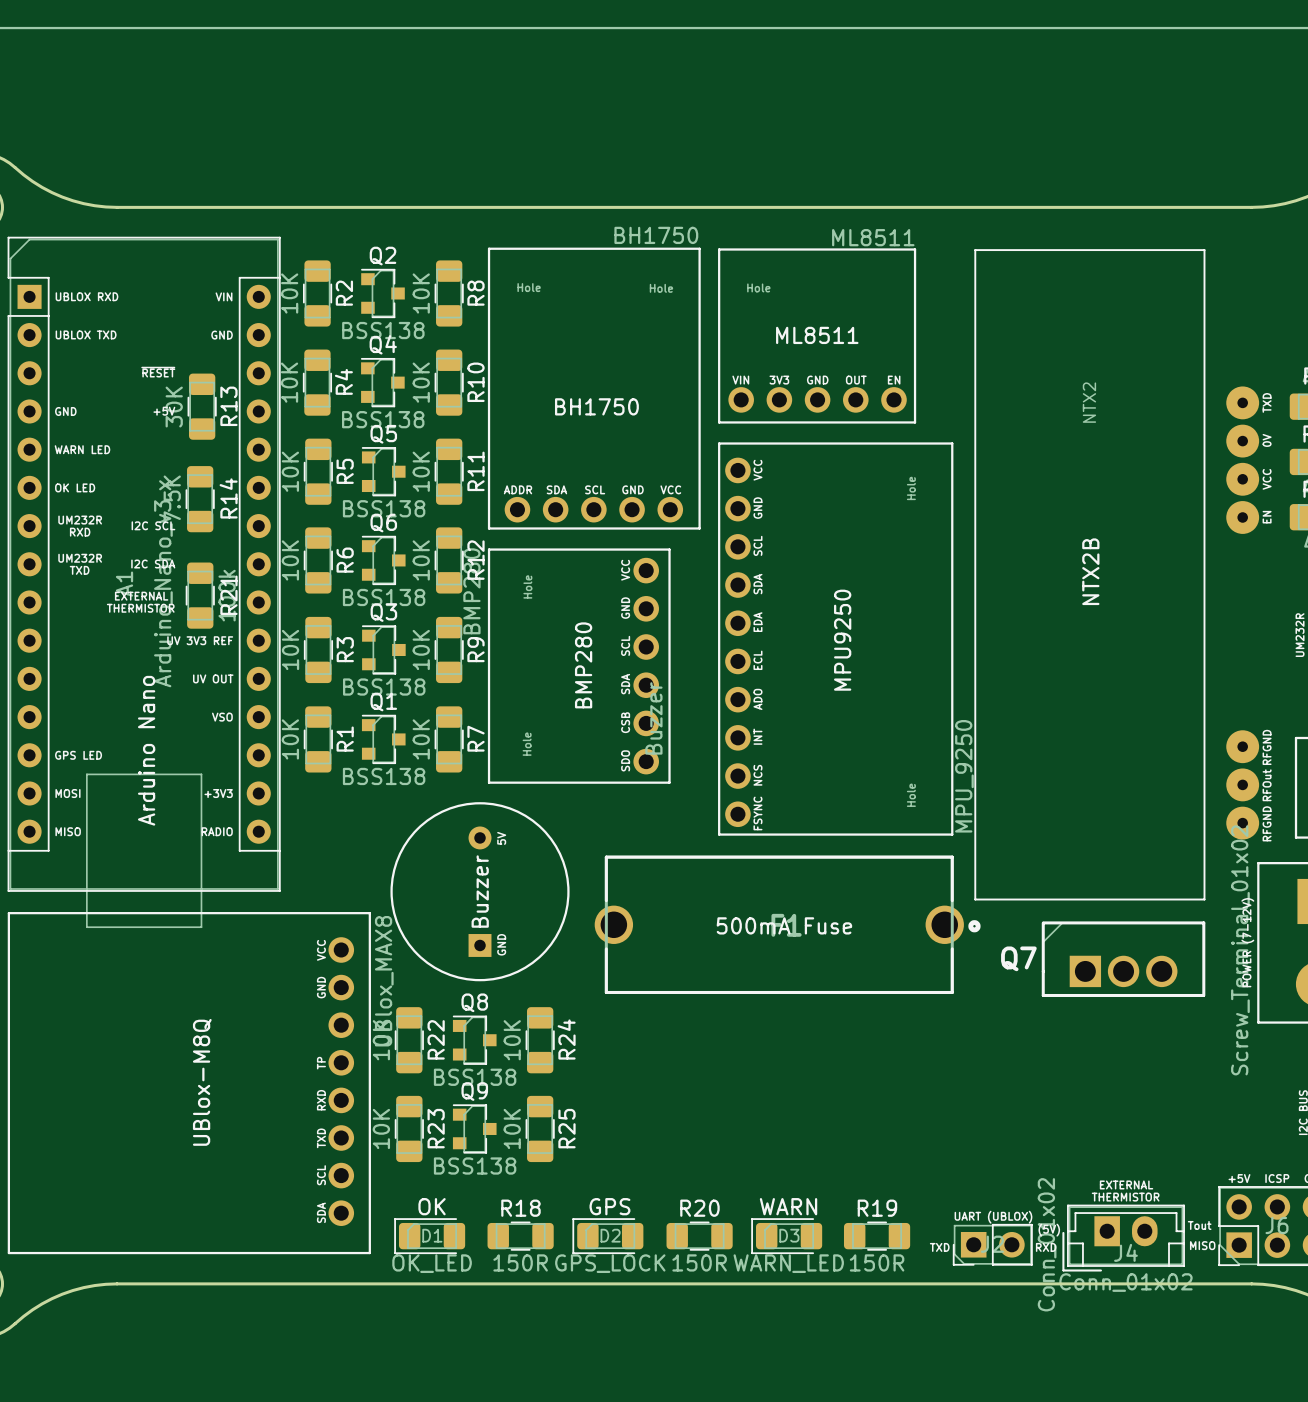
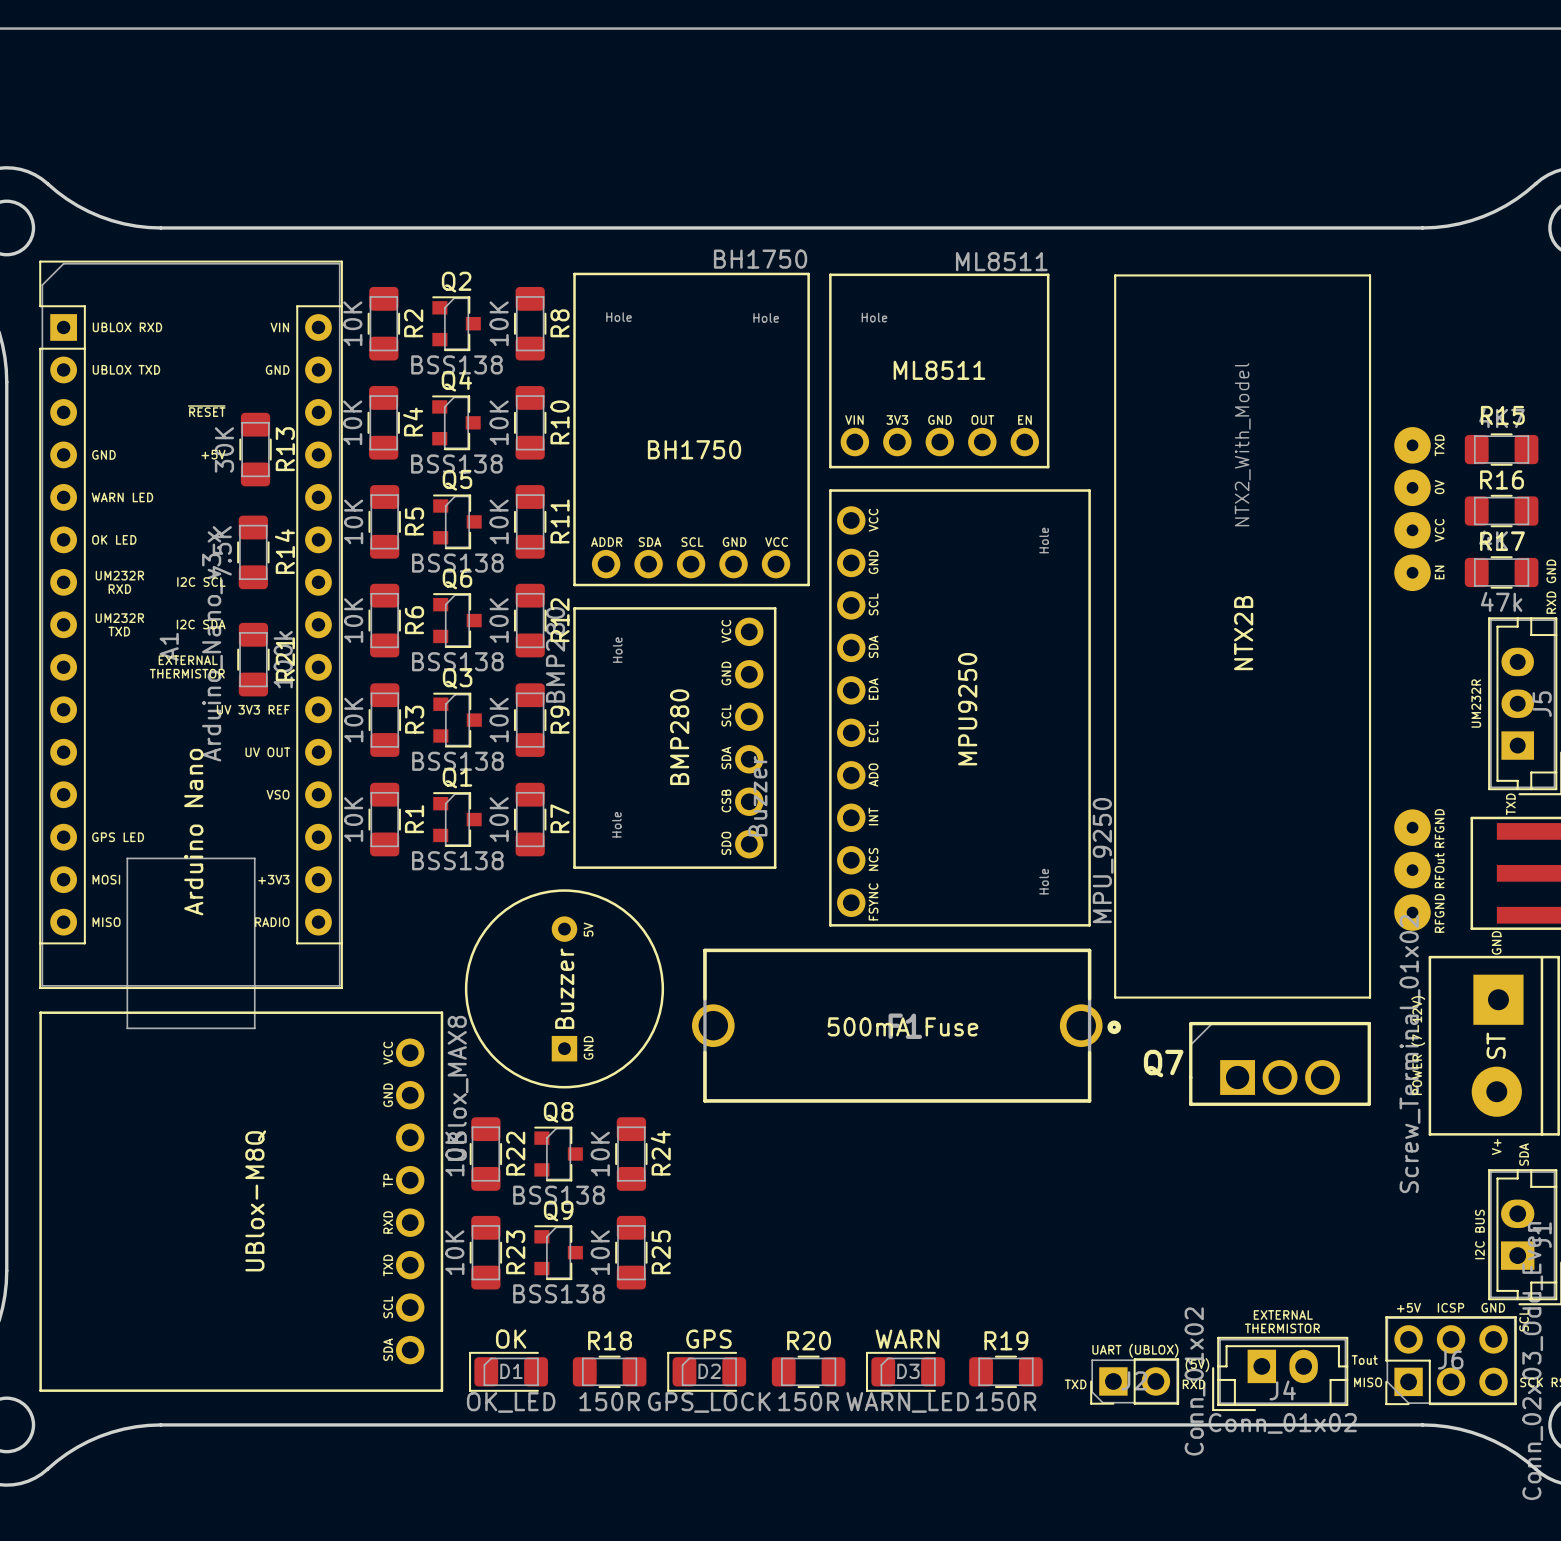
part value: NTX2 (1089, 402) -> NTX2_With_Model (1242, 444)
part footprint: [7, 912, 371, 1255] -> [39, 1011, 444, 1392]

